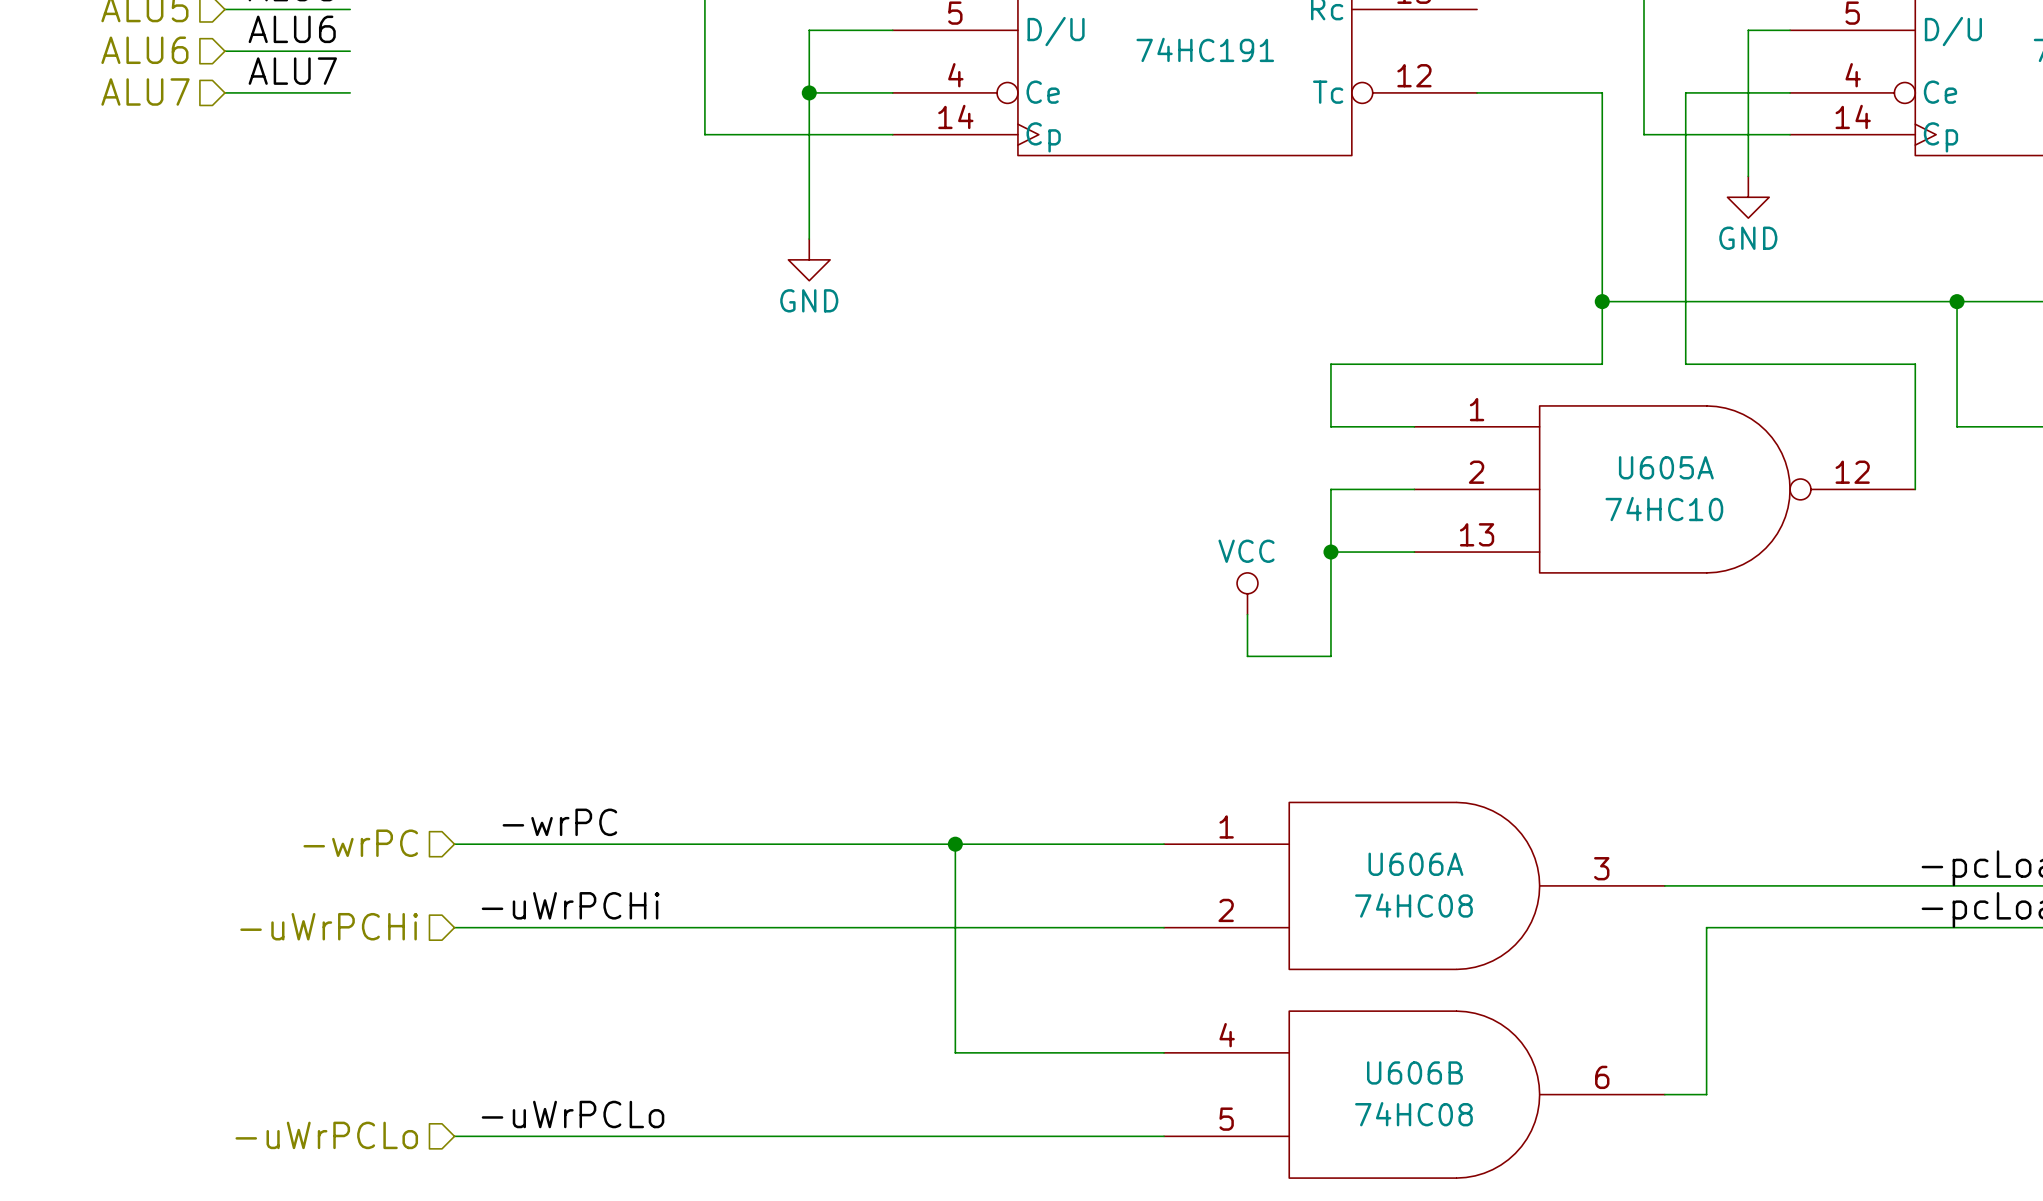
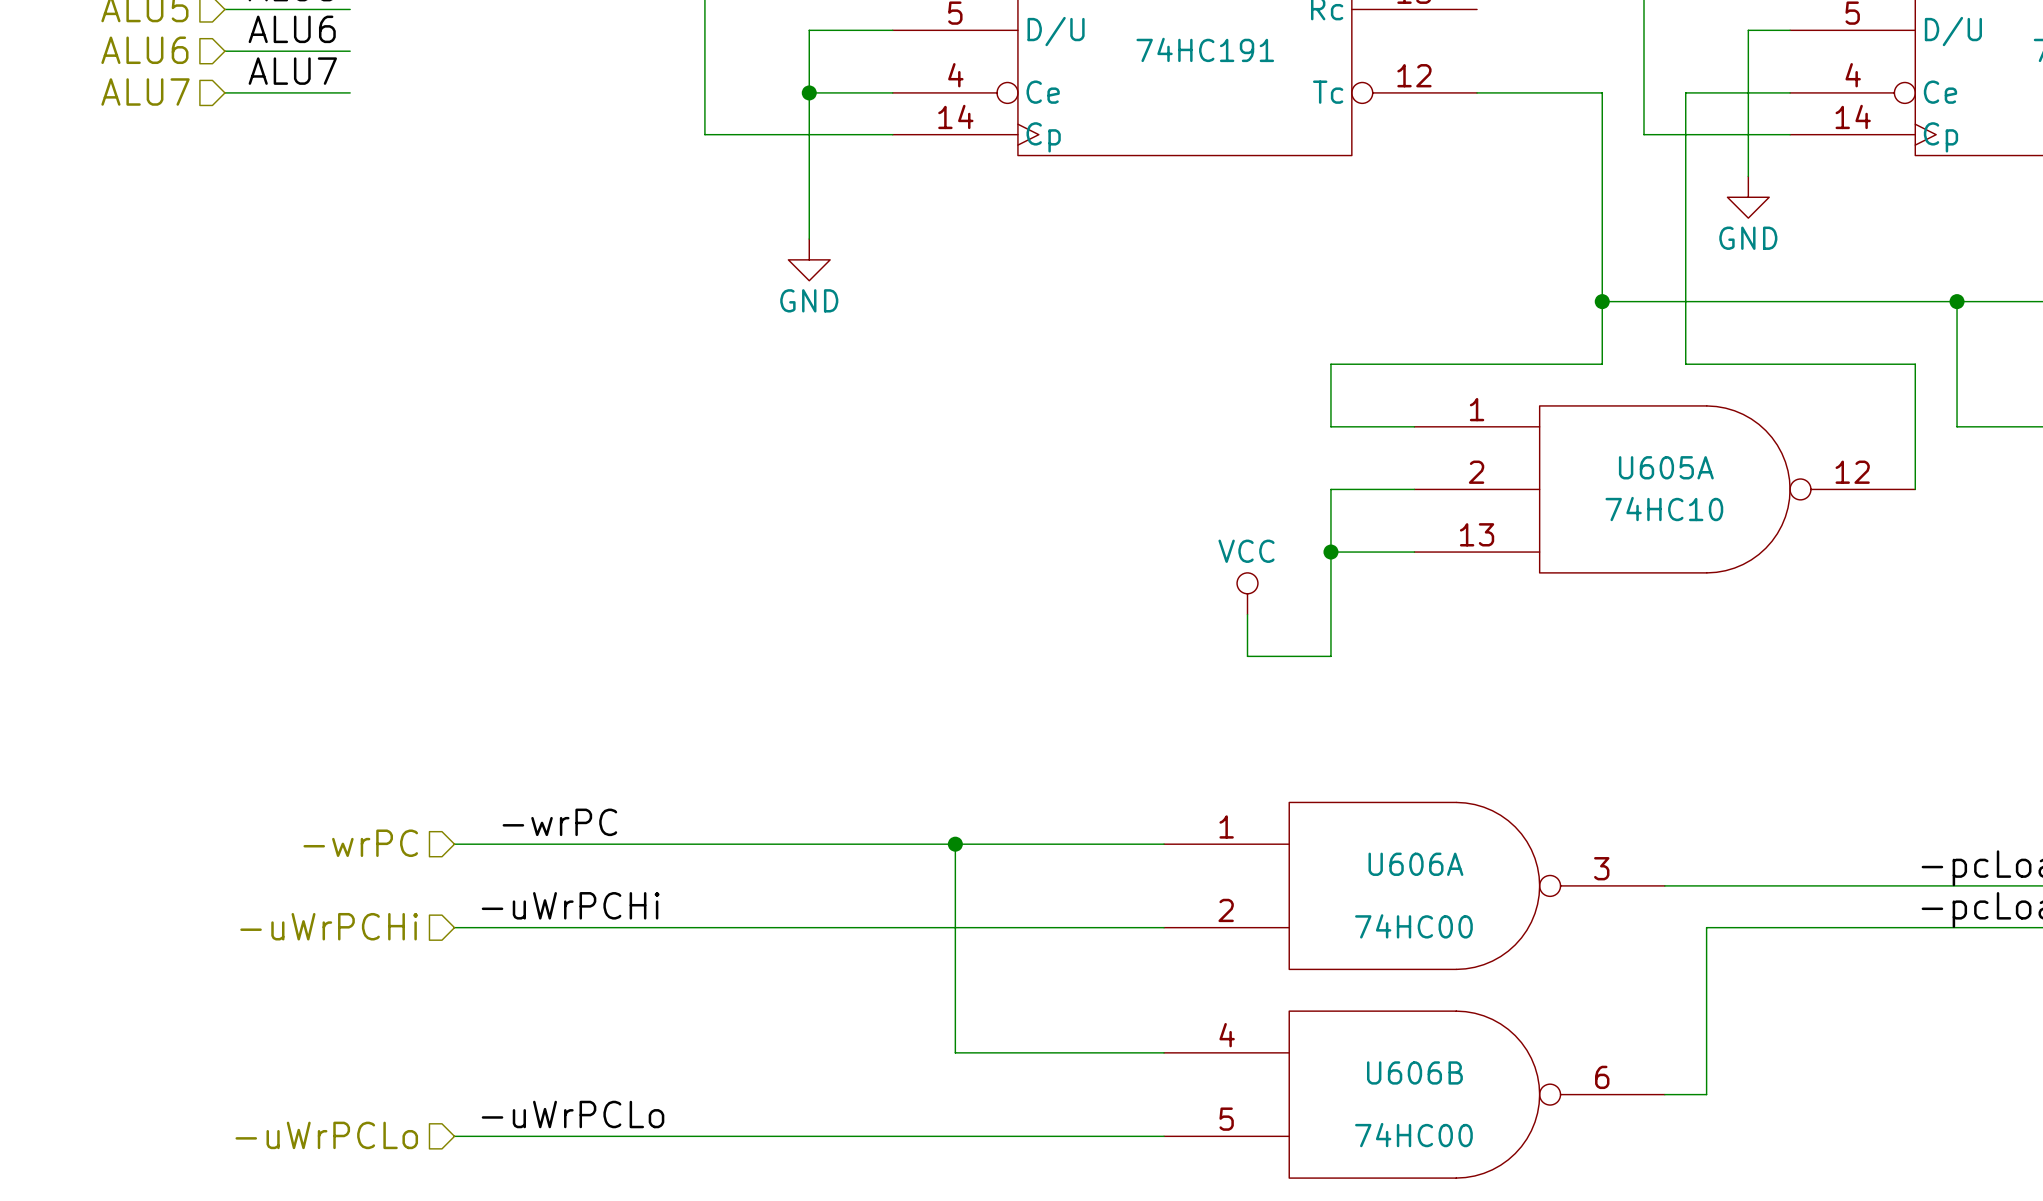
U606A symbol: [1164, 802, 1665, 970] -> [1164, 802, 1665, 970]
U606A value: 74HC08 (1413, 905) -> 74HC00 (1413, 926)
U606B symbol: [1164, 1011, 1665, 1179] -> [1164, 1011, 1665, 1179]
U606B value: 74HC08 (1413, 1114) -> 74HC00 (1413, 1135)

